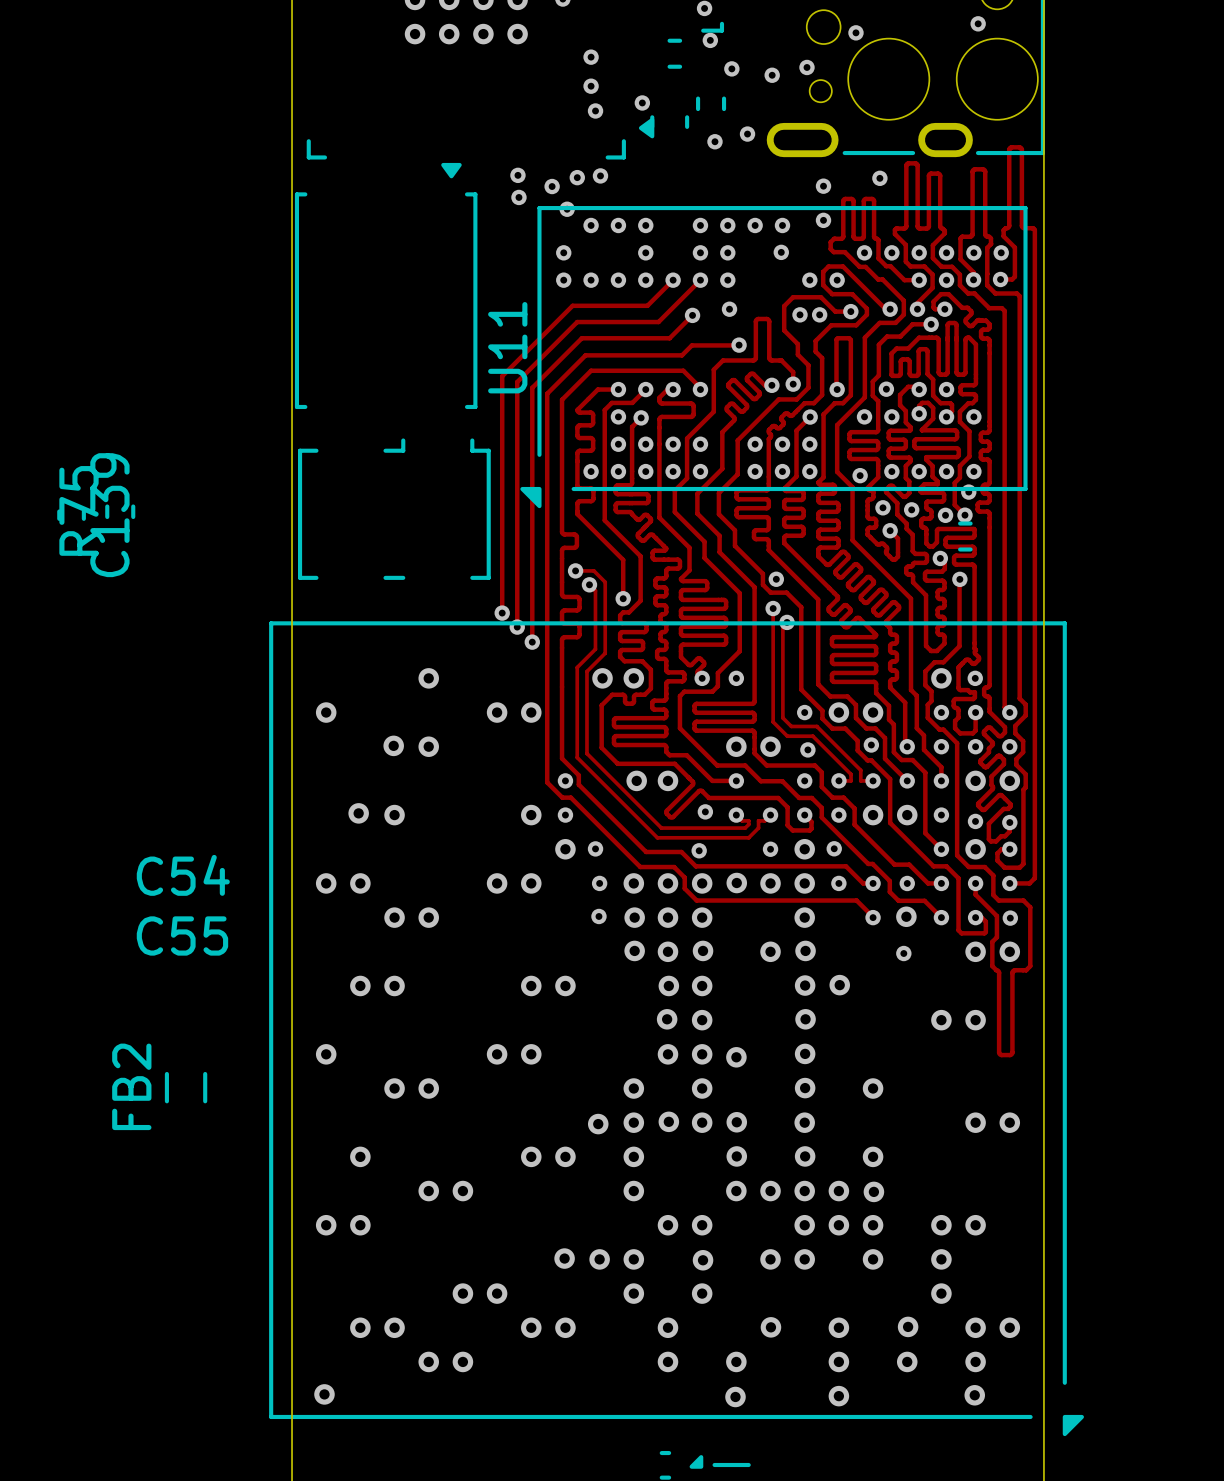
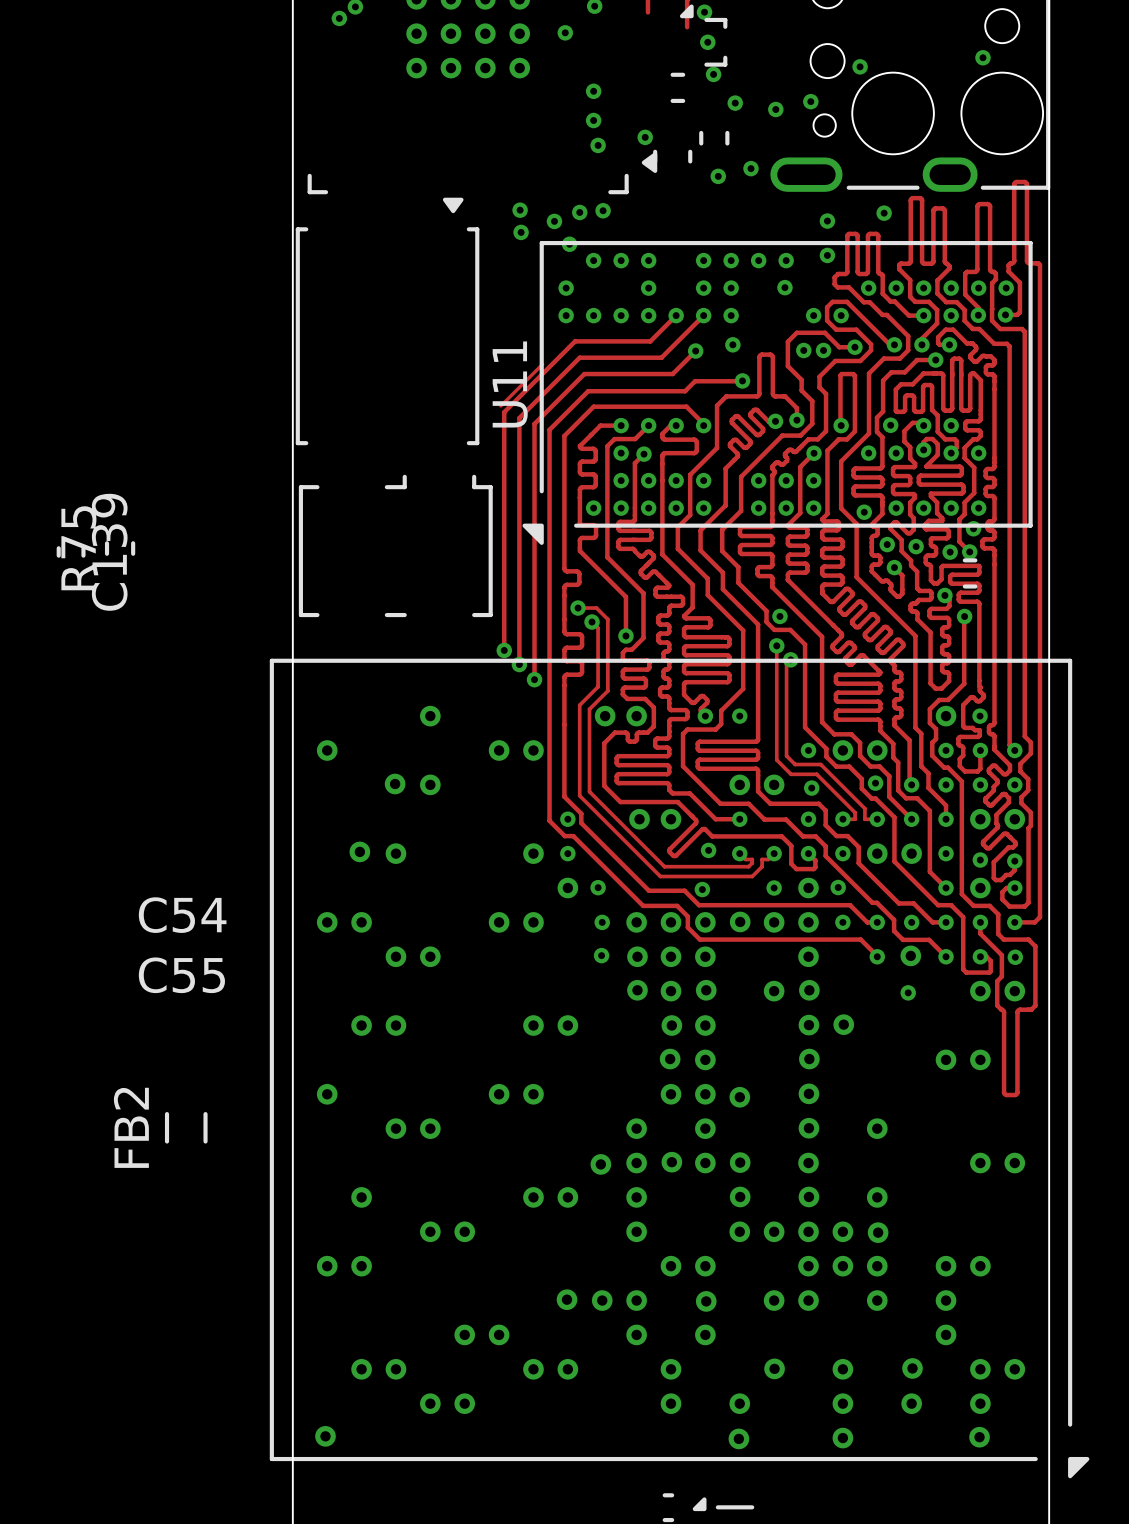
track: none -> (542, 364) (500, 406)

